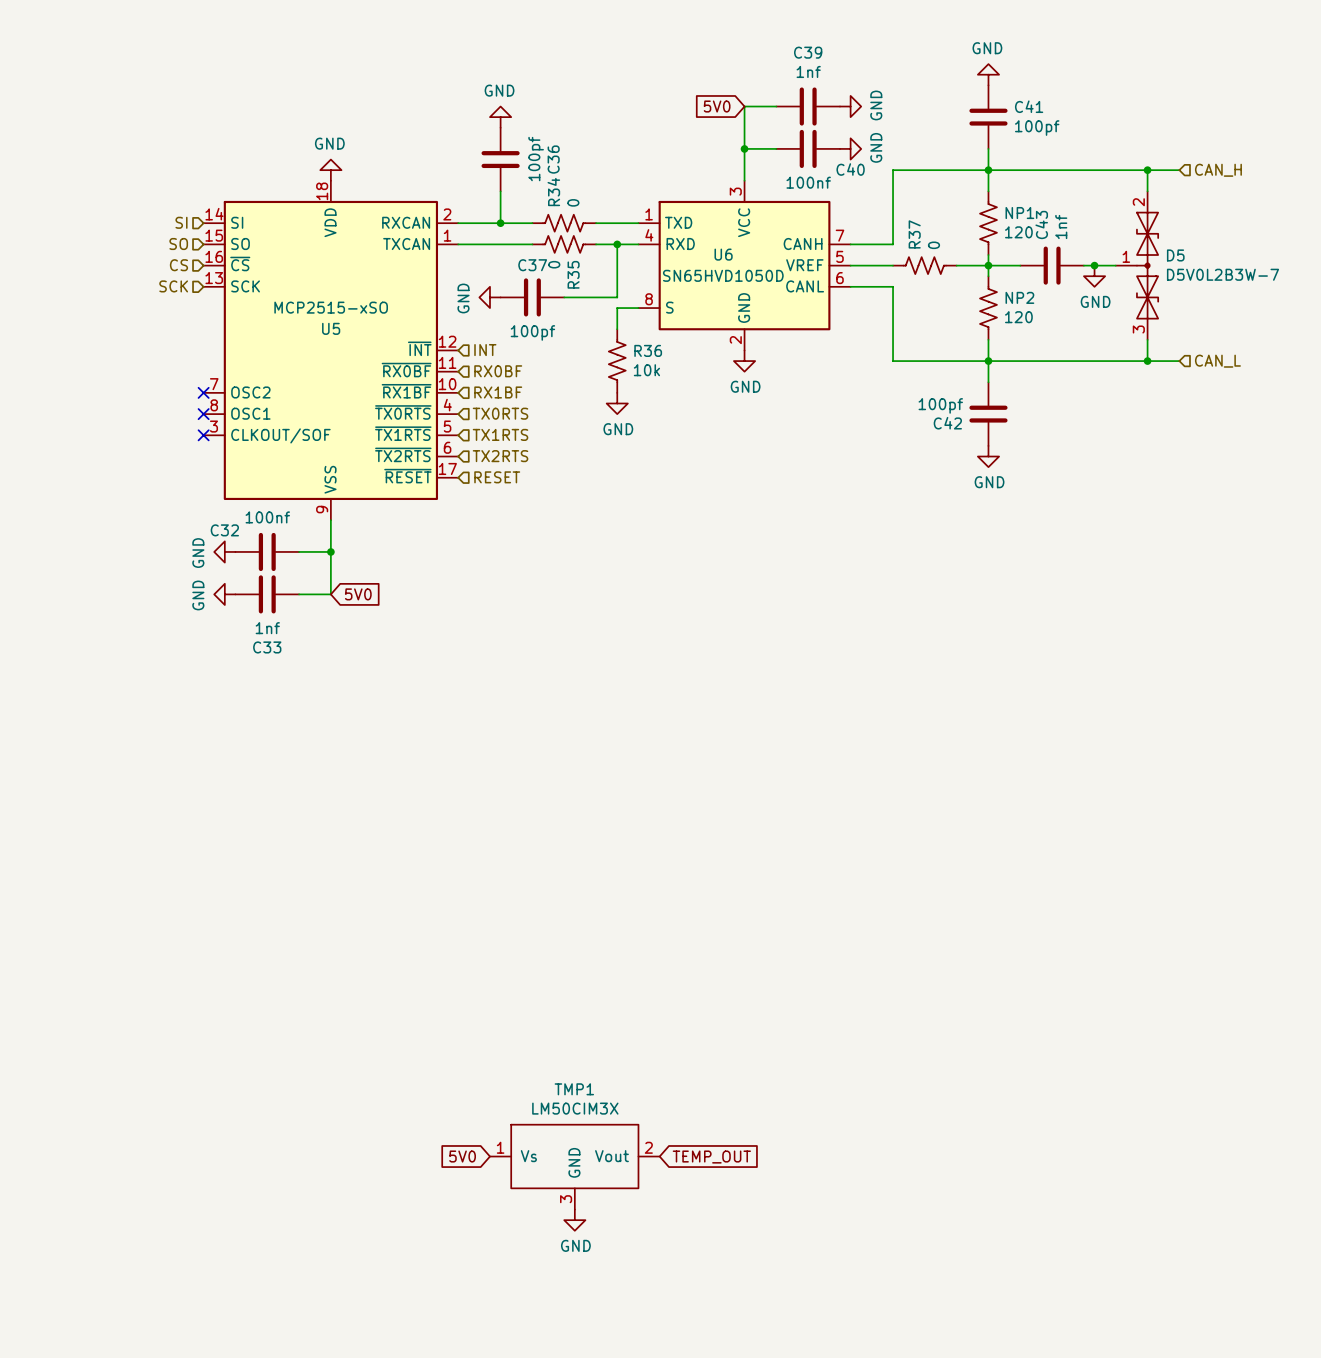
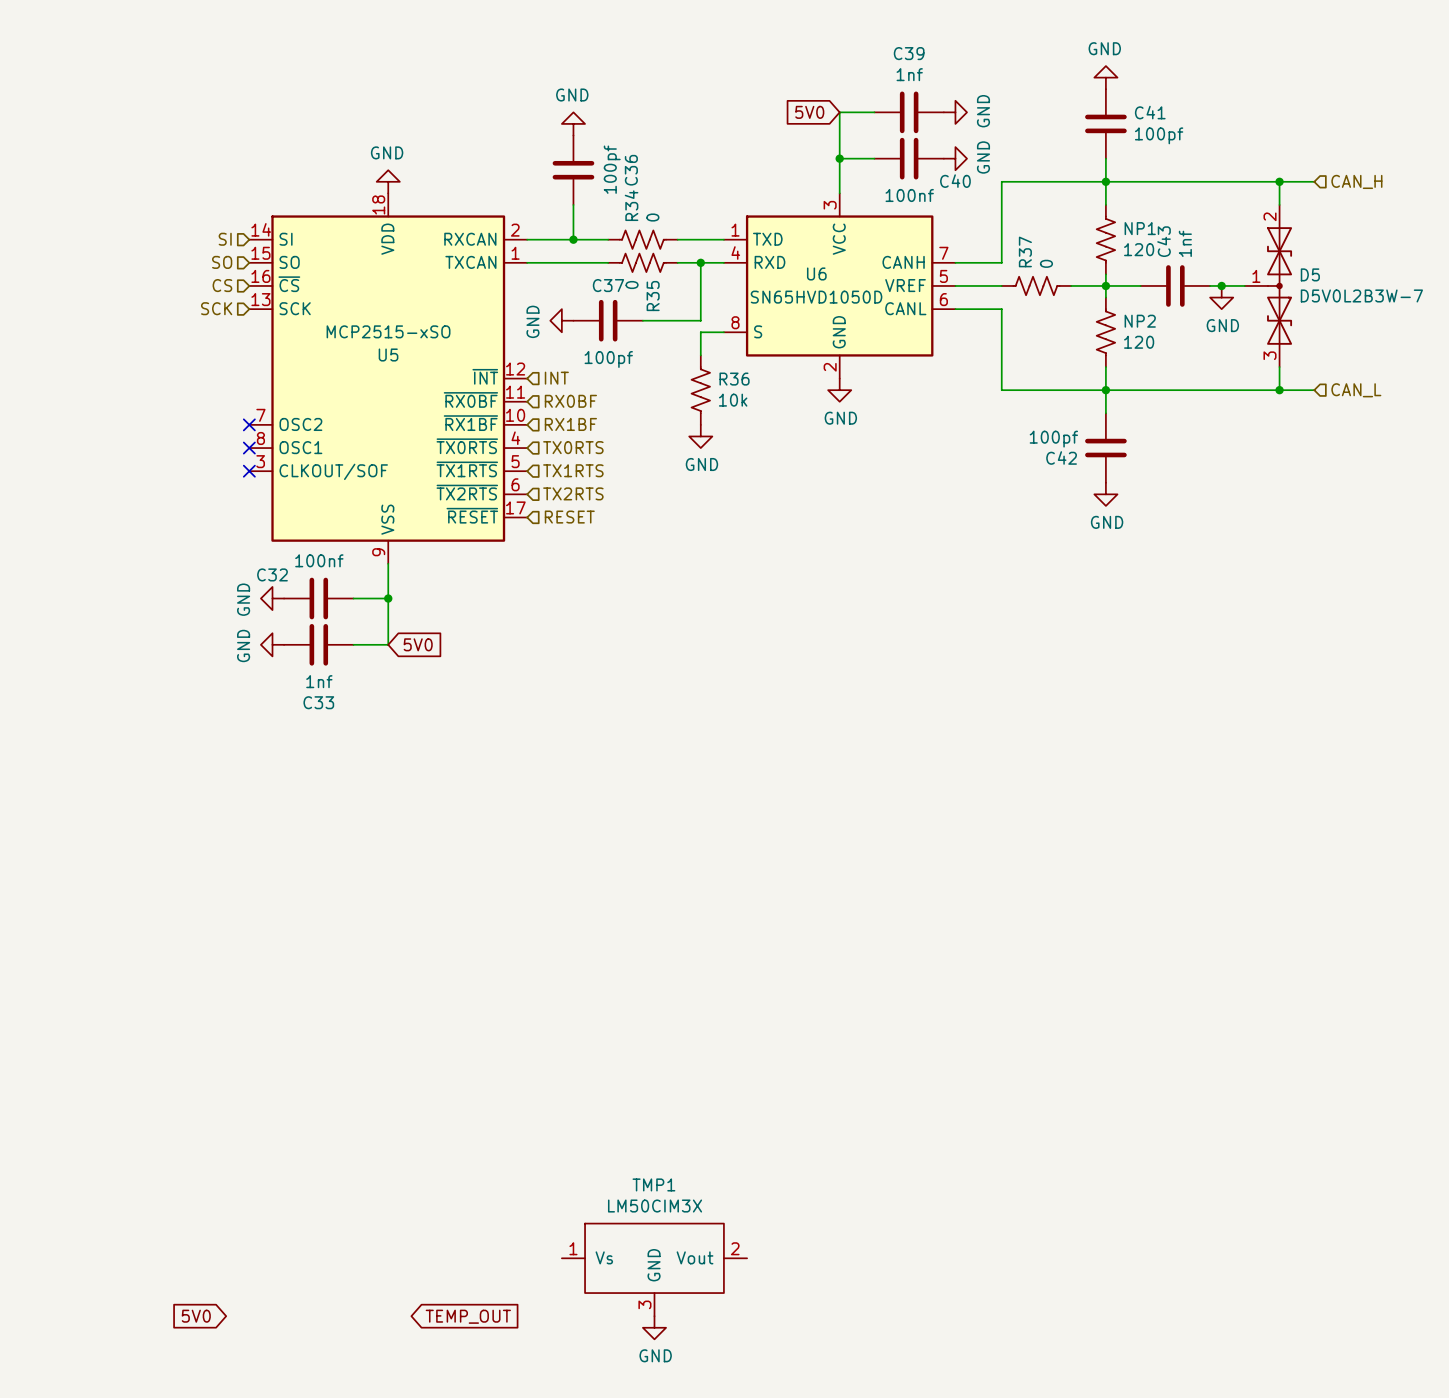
global label: 5V0 (462, 1156) -> none
global label: TEMP_OUT (711, 1157) -> none
global label: none -> 5V0 (196, 1316)
global label: none -> TEMP_OUT (468, 1316)

